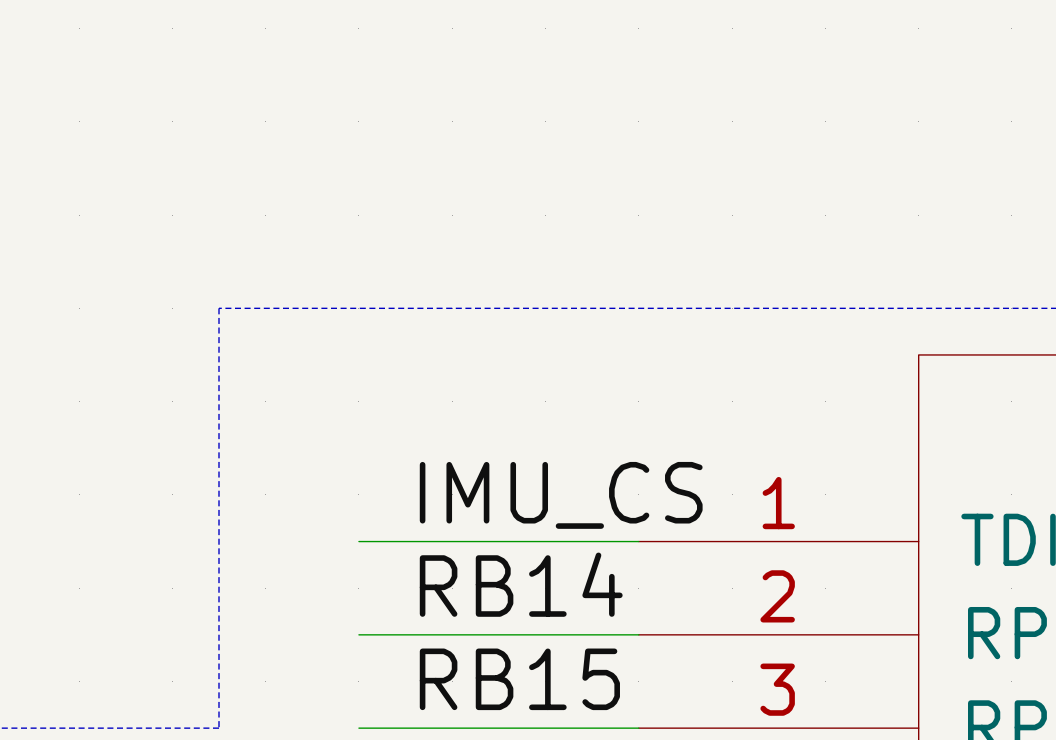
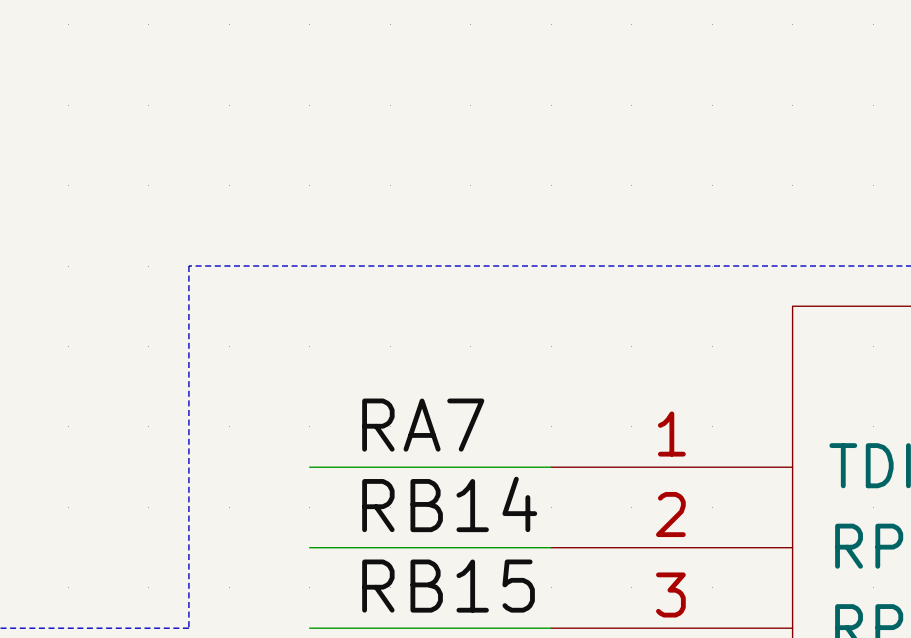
label: IMU_CS (561, 495) -> RA7 (423, 425)

